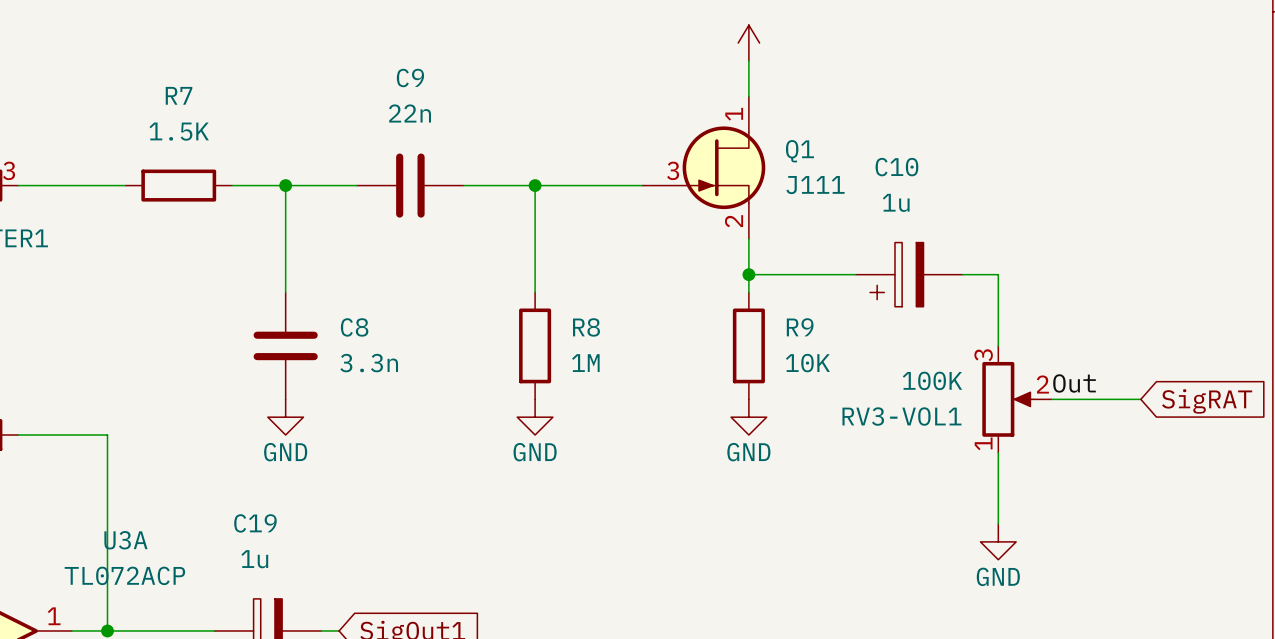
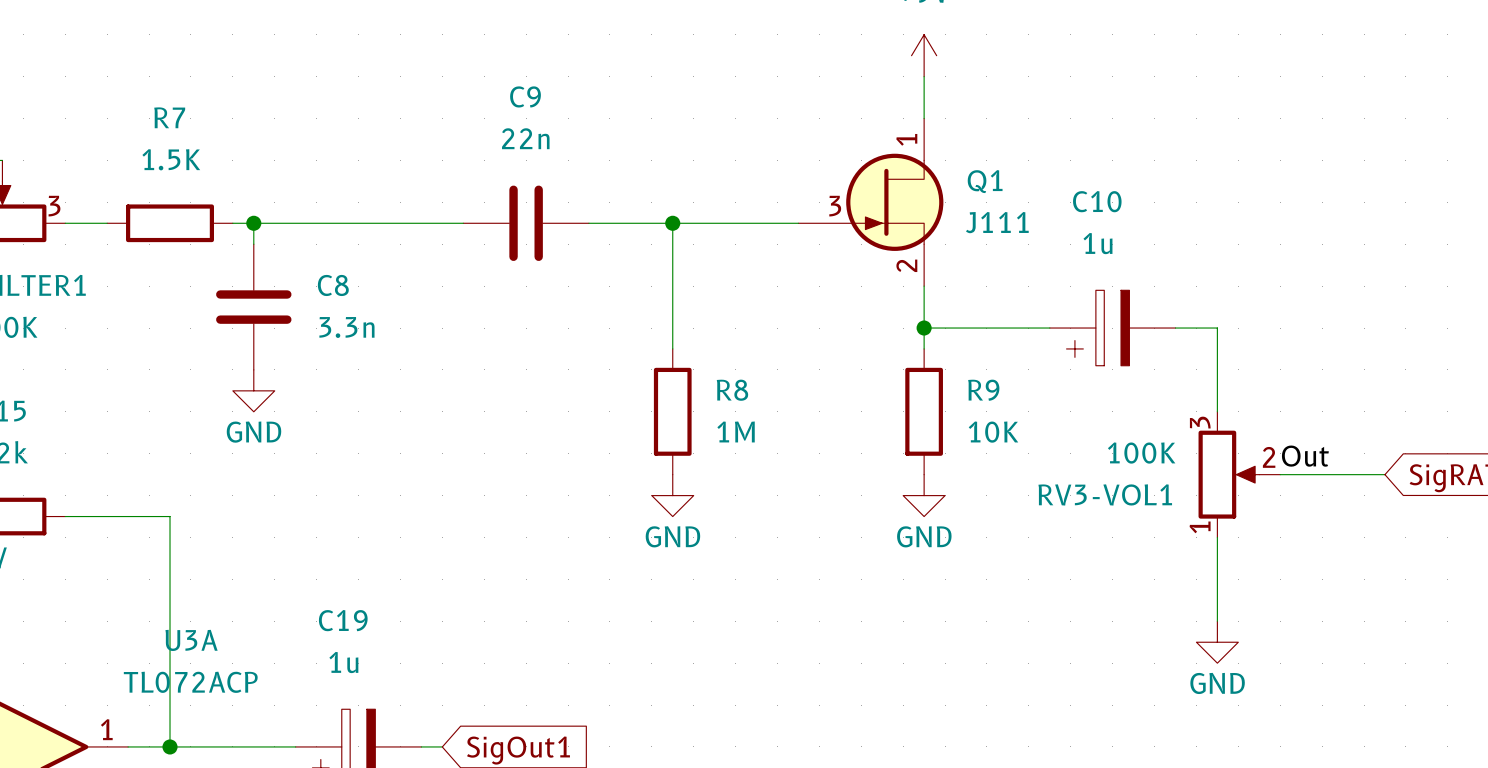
wire: (54, 185) (125, 185) -> (232, 223) (316, 223)
wire: none -> (253, 223) (253, 244)
junction: none -> (253, 223)
R7 position: (178, 185) -> (170, 223)
wire: (285, 185) (285, 292) -> none
junction: (285, 185) -> none
C8 position: (285, 345) -> (253, 307)
power symbol position: GND (285, 417) -> GND (253, 390)

